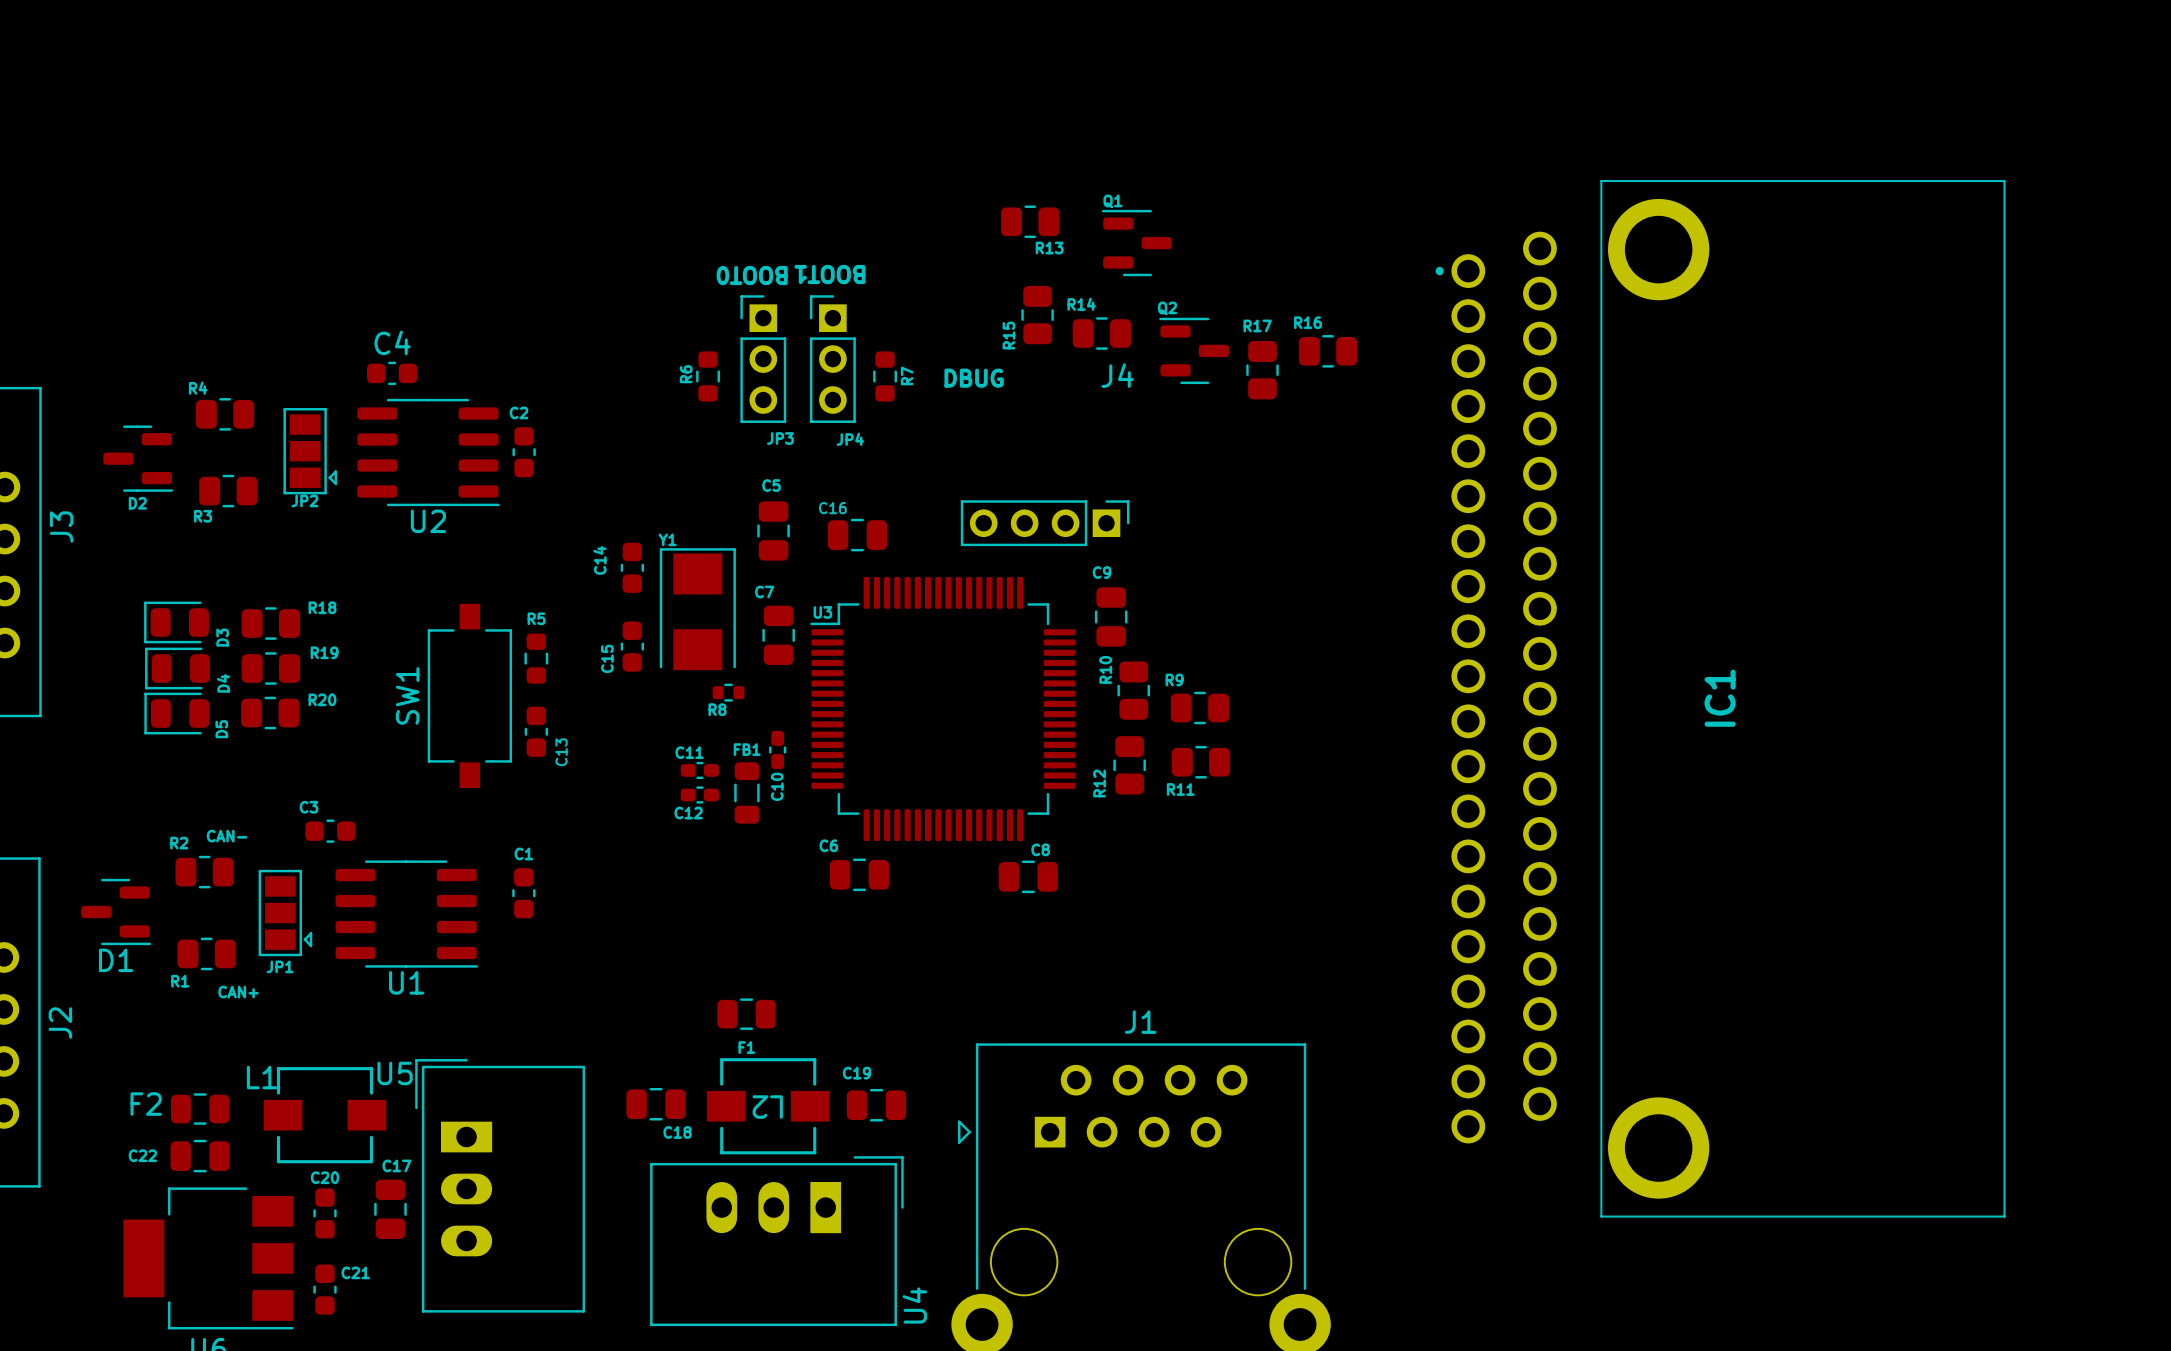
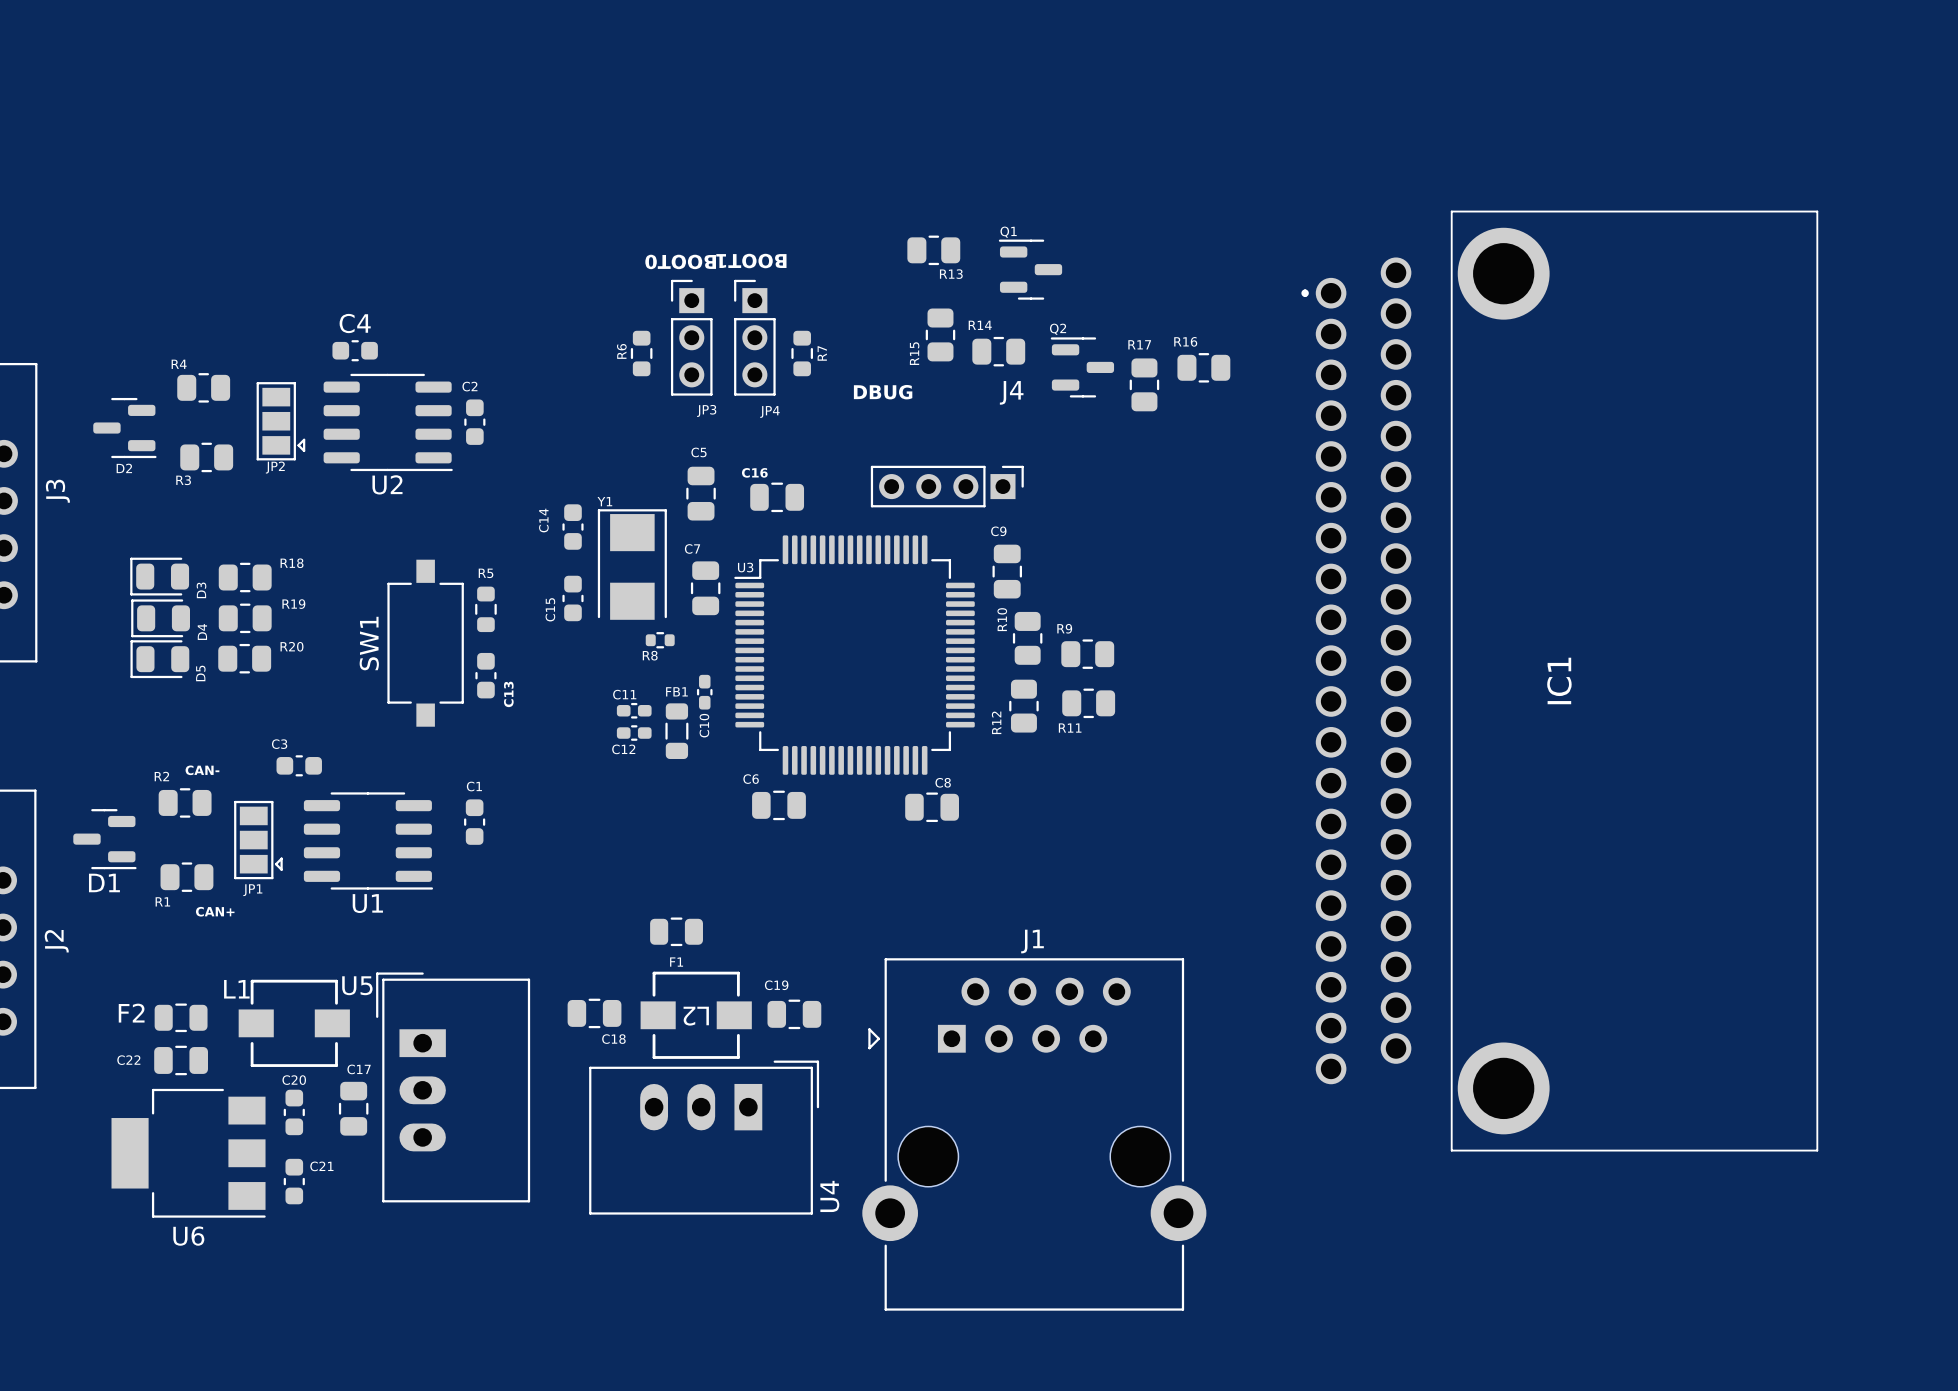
R13 position: (1030, 221) -> (933, 250)
Q1 position: (1136, 243) -> (1030, 269)
R15 position: (1037, 315) -> (940, 334)
R14 position: (1101, 333) -> (998, 351)
Q2 position: (1194, 350) -> (1082, 367)
R16 position: (1328, 351) -> (1203, 367)
R17 position: (1262, 370) -> (1144, 384)
J4 name position: J4 (1117, 375) -> J4 (1011, 392)
text position: DBUG (974, 378) -> DBUG (883, 392)
IC1 position: (1720, 698) -> (1559, 681)

